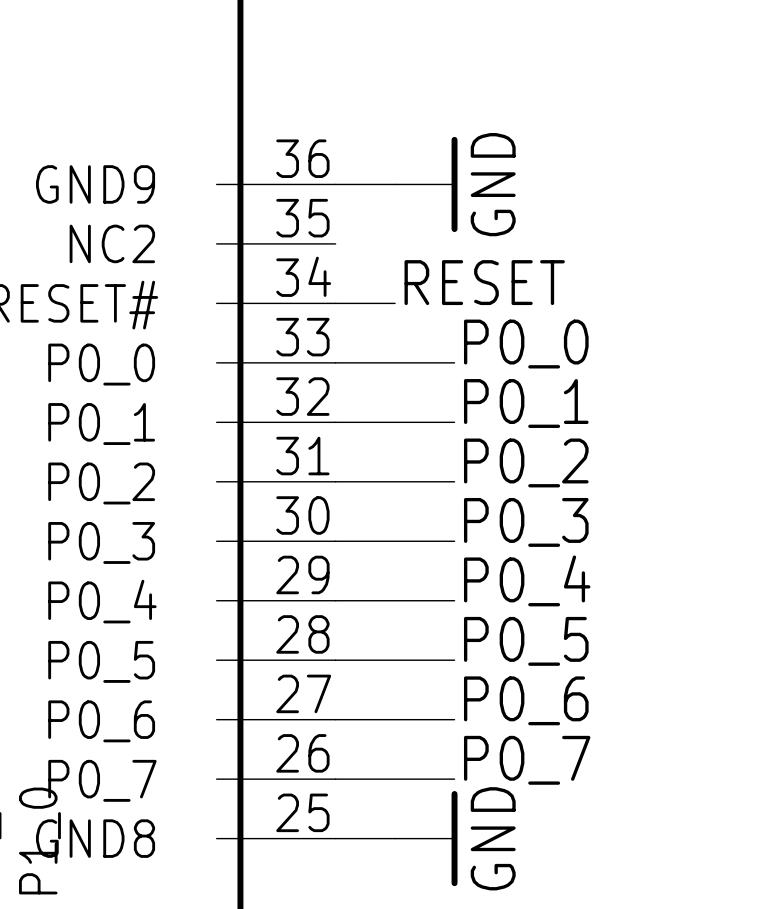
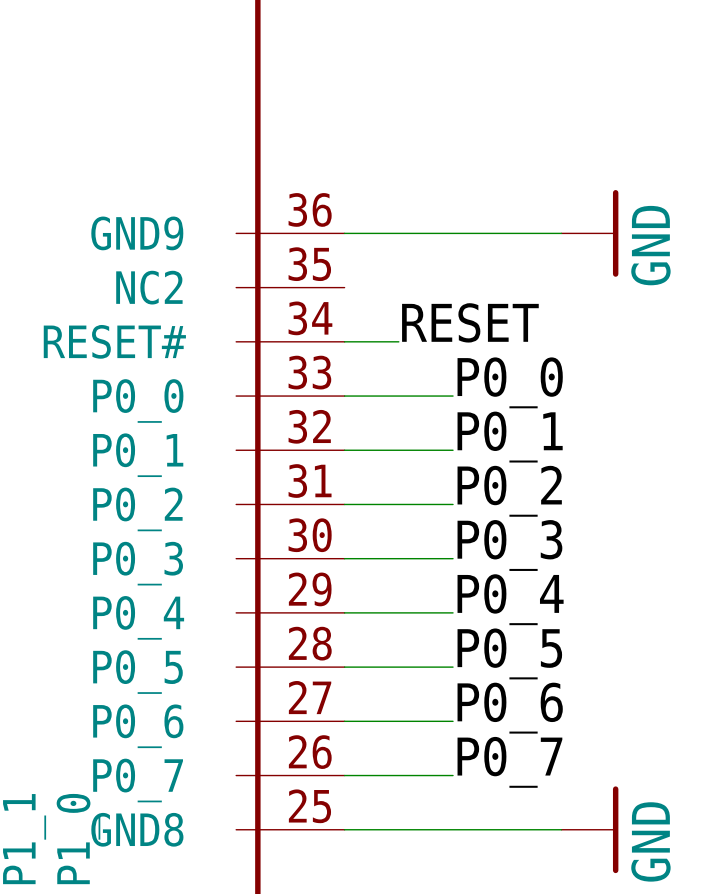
wire: none -> (398, 233) (561, 233)
power symbol position: GND (426, 184) -> GND (589, 233)
wire: none -> (398, 829) (561, 829)
power symbol position: GND (426, 838) -> GND (589, 829)

